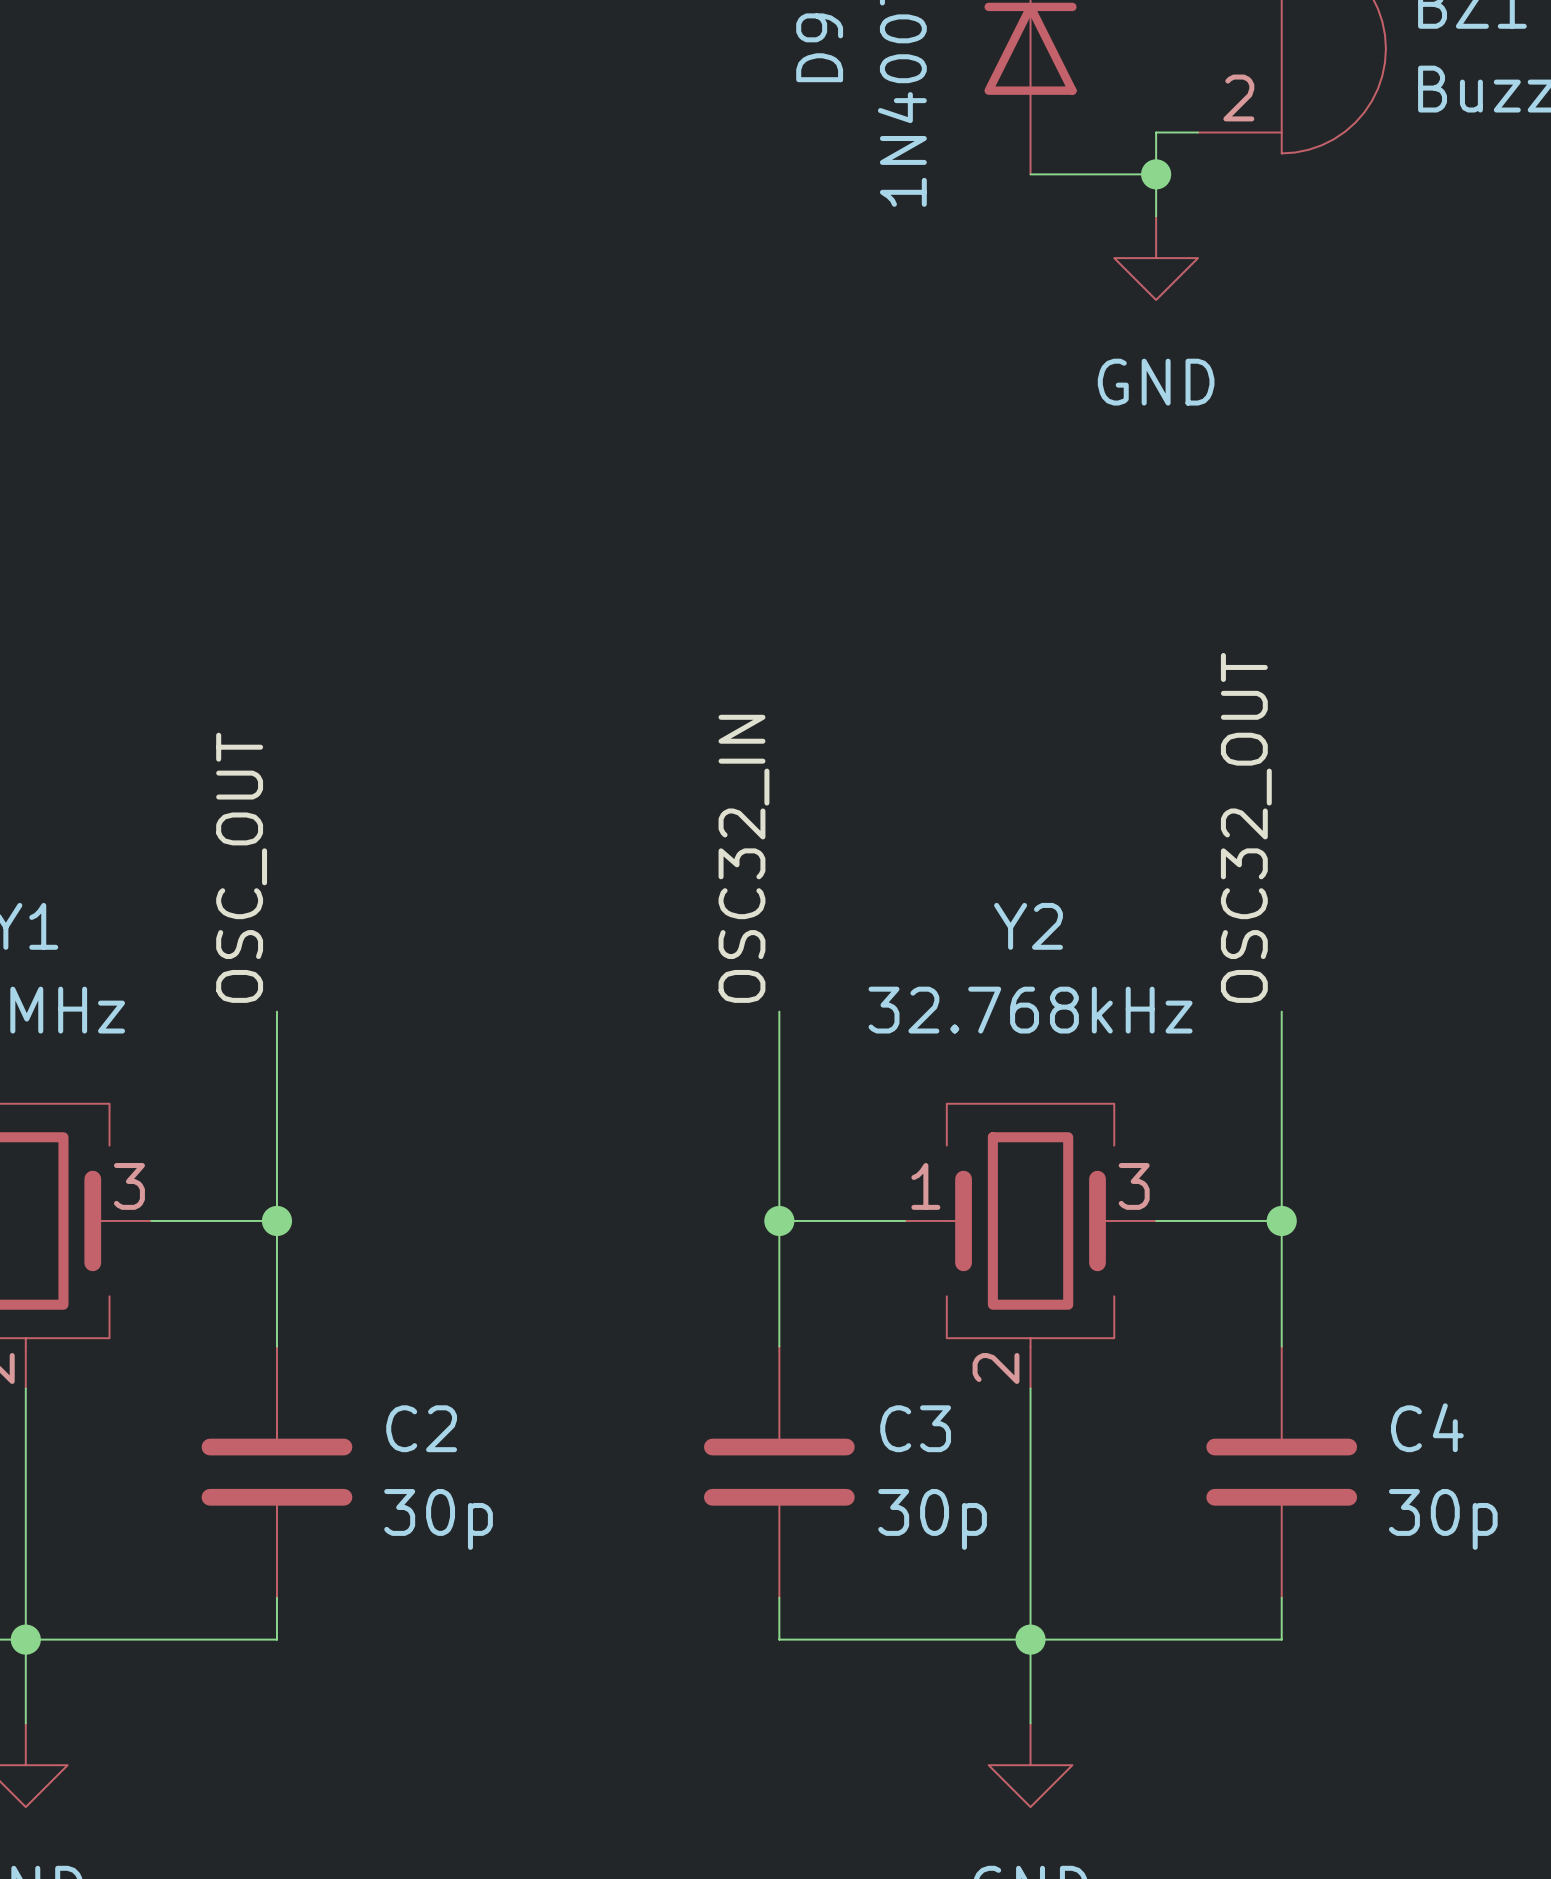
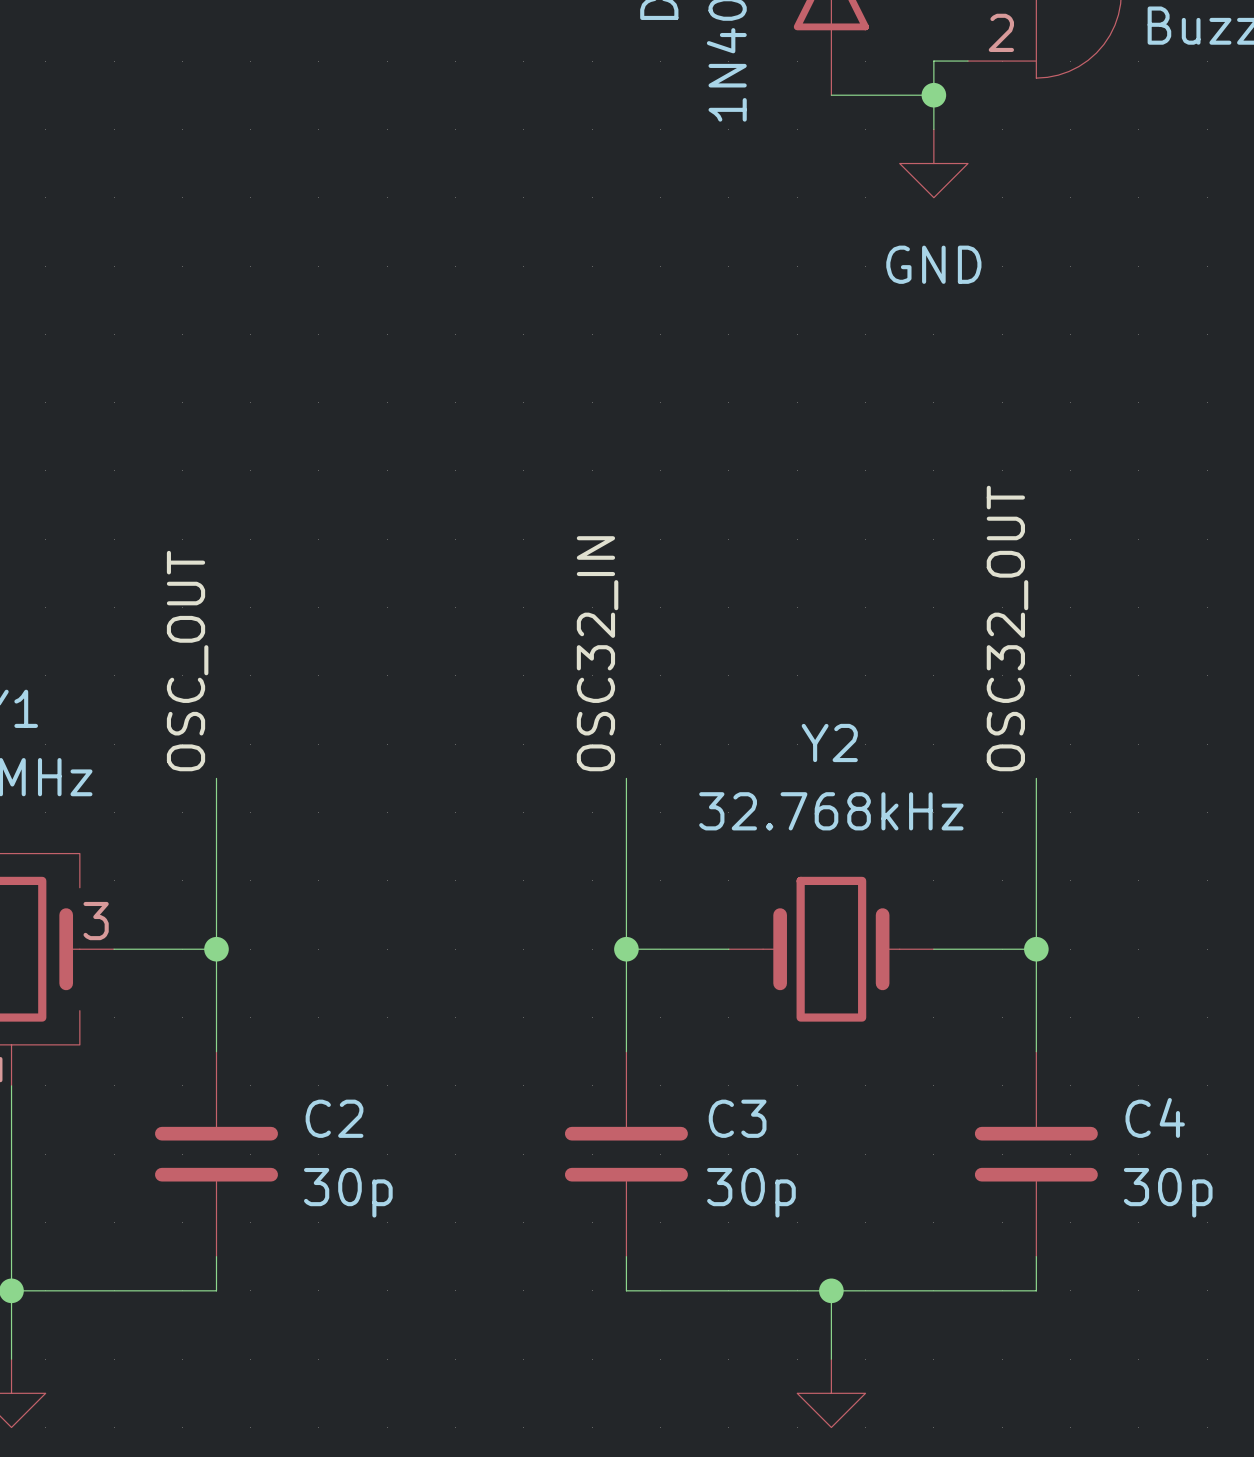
Y2 name position: Y2 (1028, 926) -> Y2 (829, 742)
Y2 value position: 32.768kHz (1030, 1010) -> 32.768kHz (831, 811)
Y2 symbol: [904, 1103, 1157, 1389] -> [728, 876, 934, 1022]
wire: (1030, 1388) (1030, 1639) -> none

